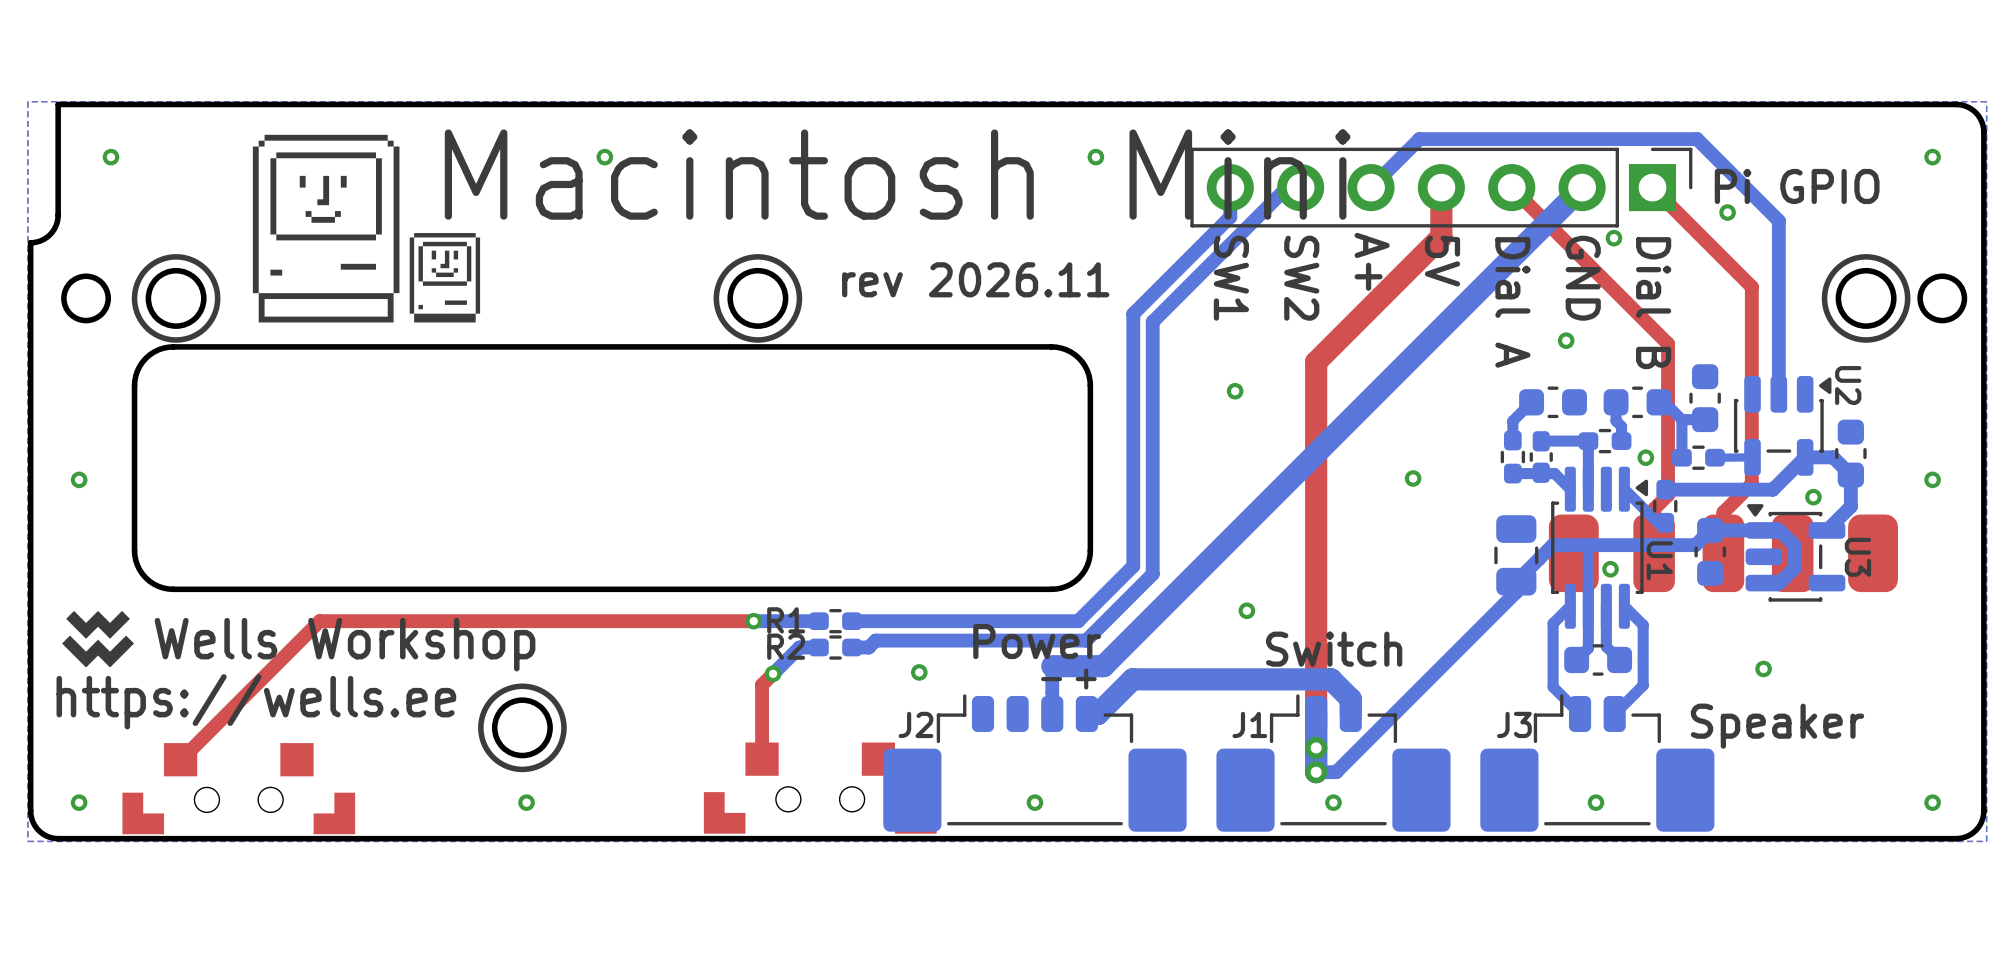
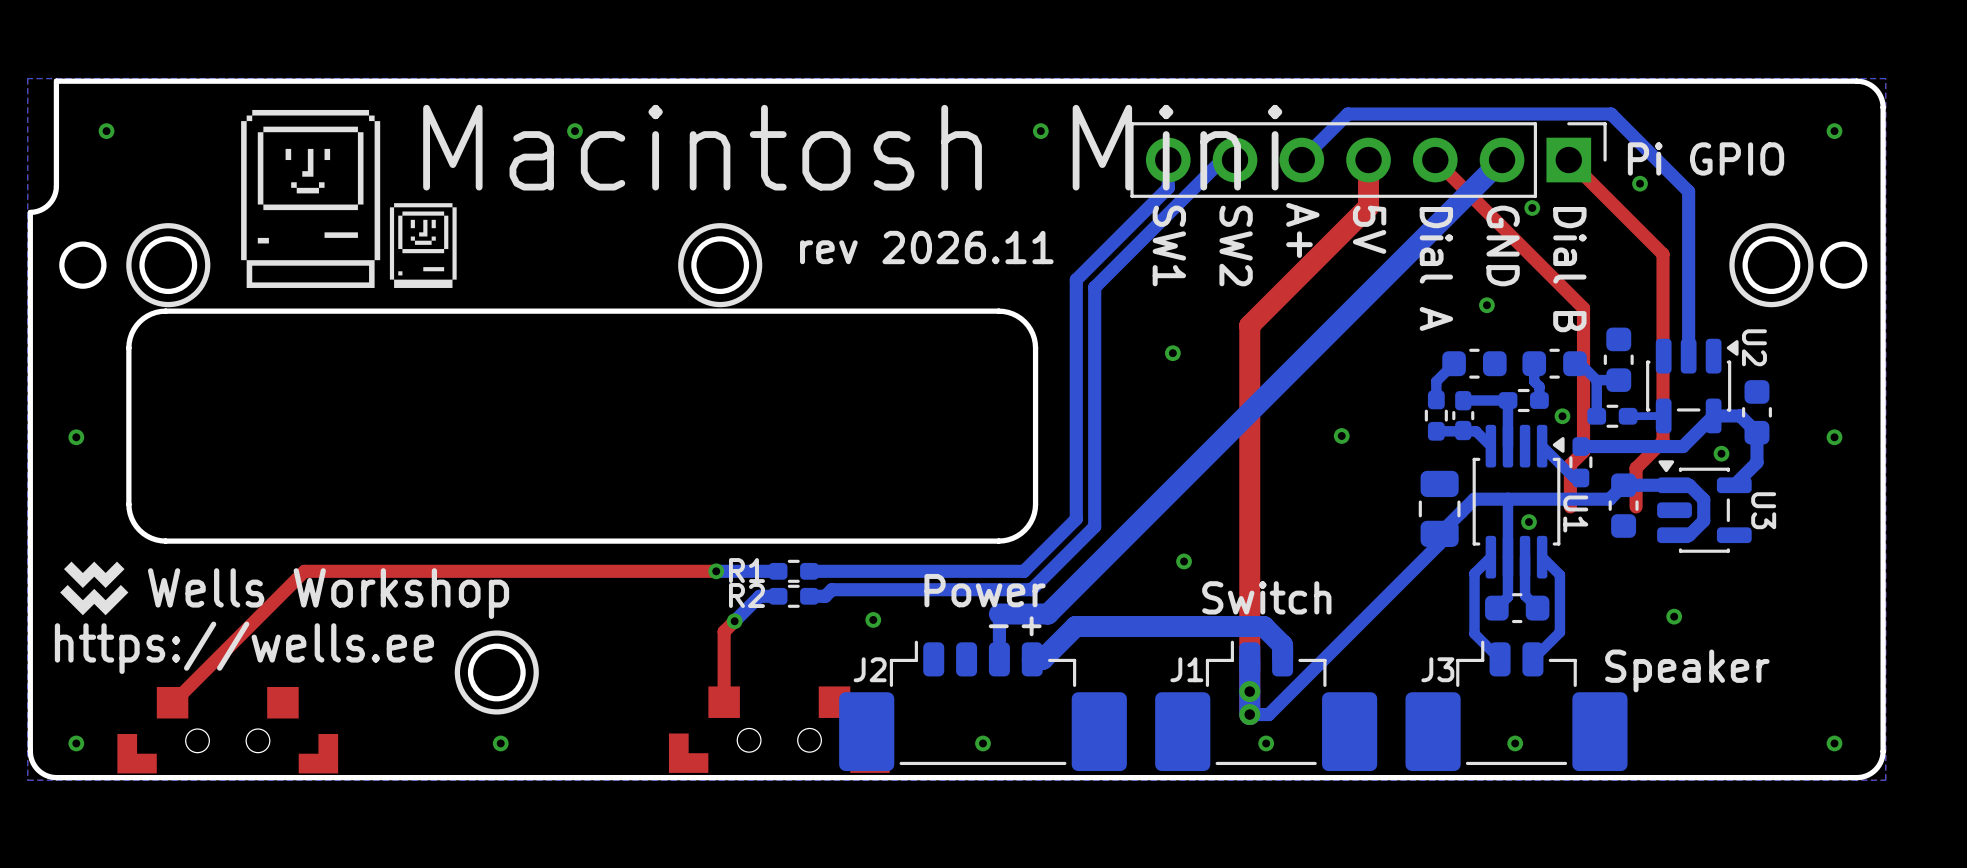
part: (1723, 553) -> none

